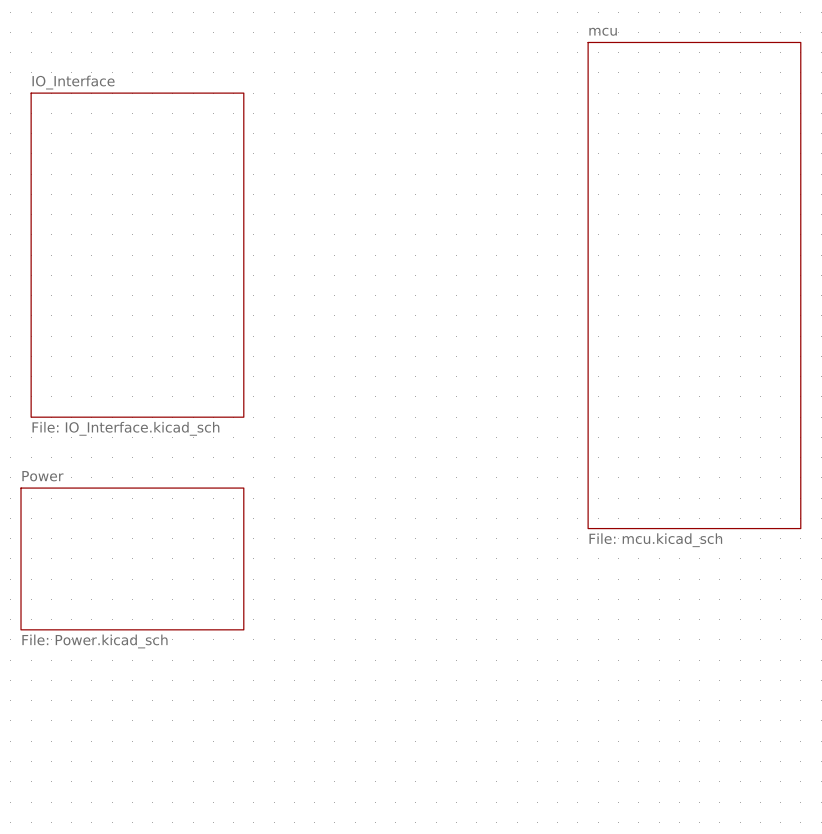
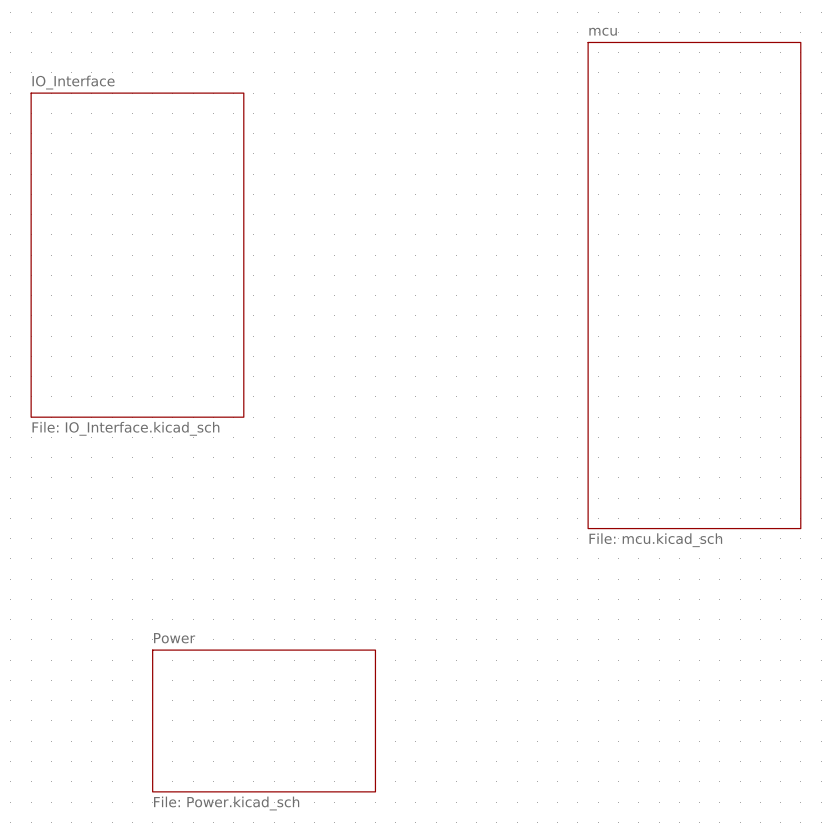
sheet Power: File: Power.kicad_sch (132, 558) -> none
sheet Power: none -> File: Power.kicad_sch (264, 720)

